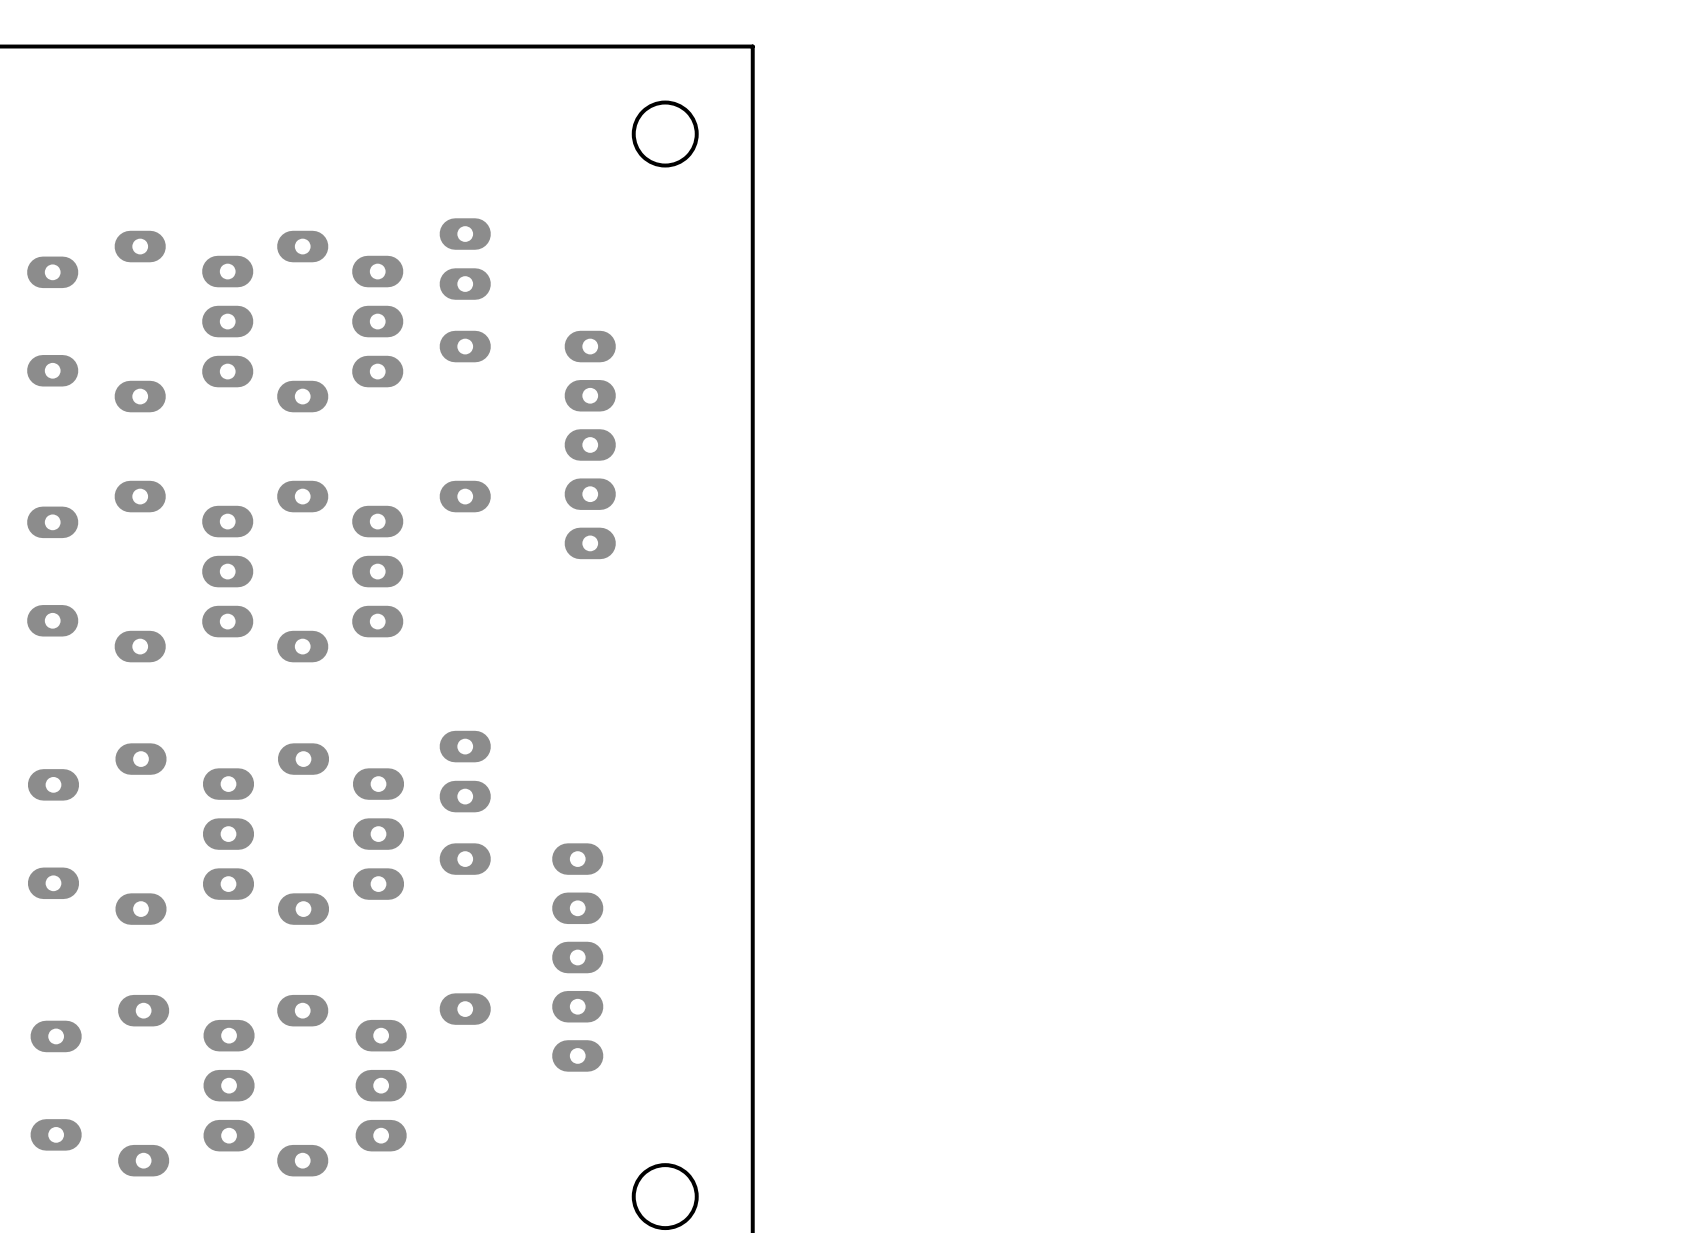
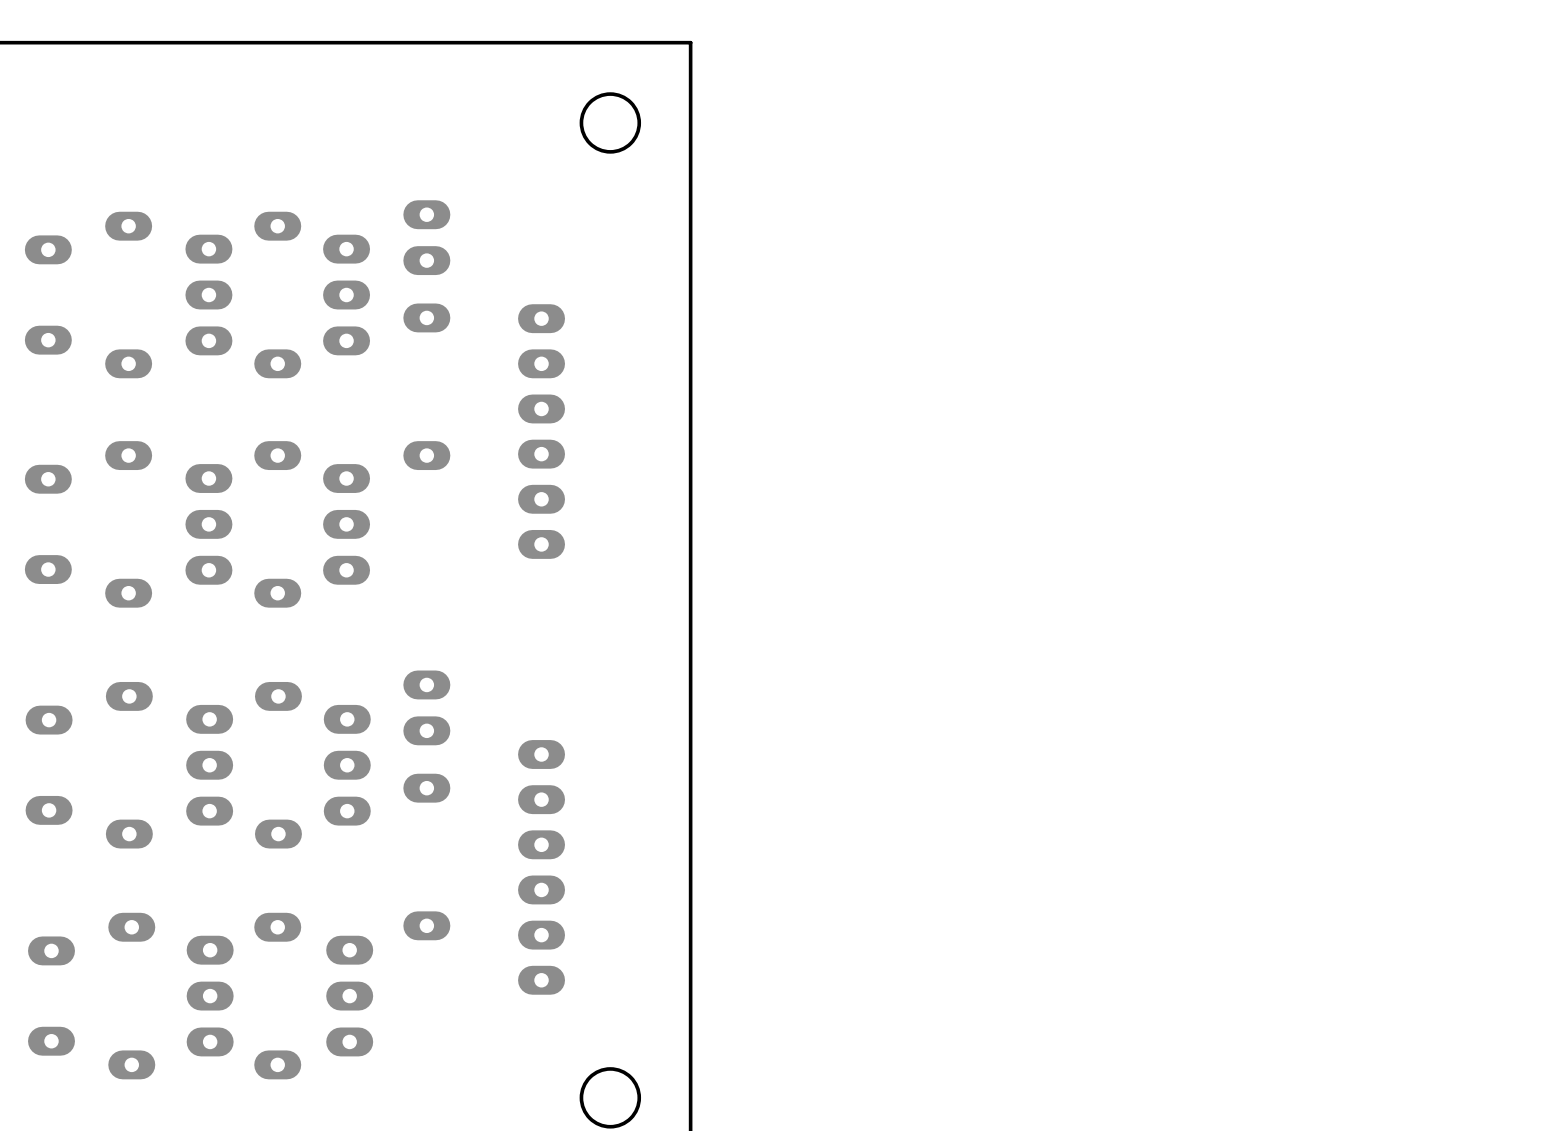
part: (590, 444) -> none
part: none -> (541, 431)
part footprint: [552, 843, 604, 1072] -> [518, 740, 566, 995]

